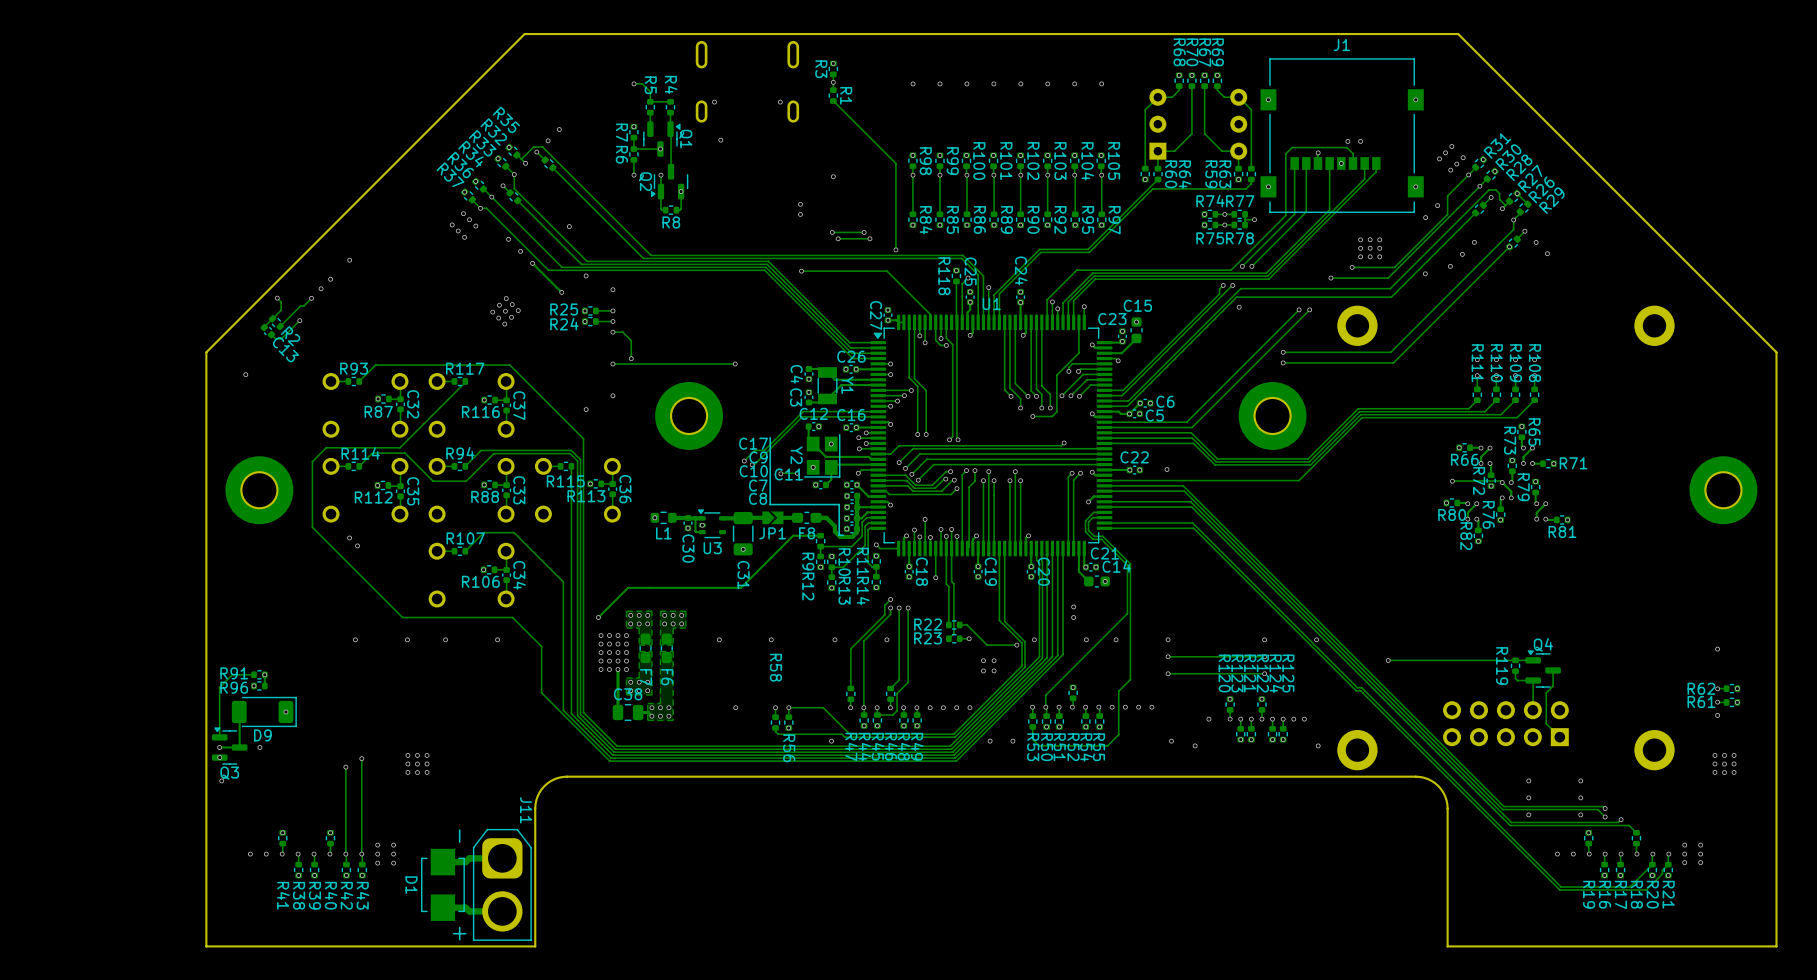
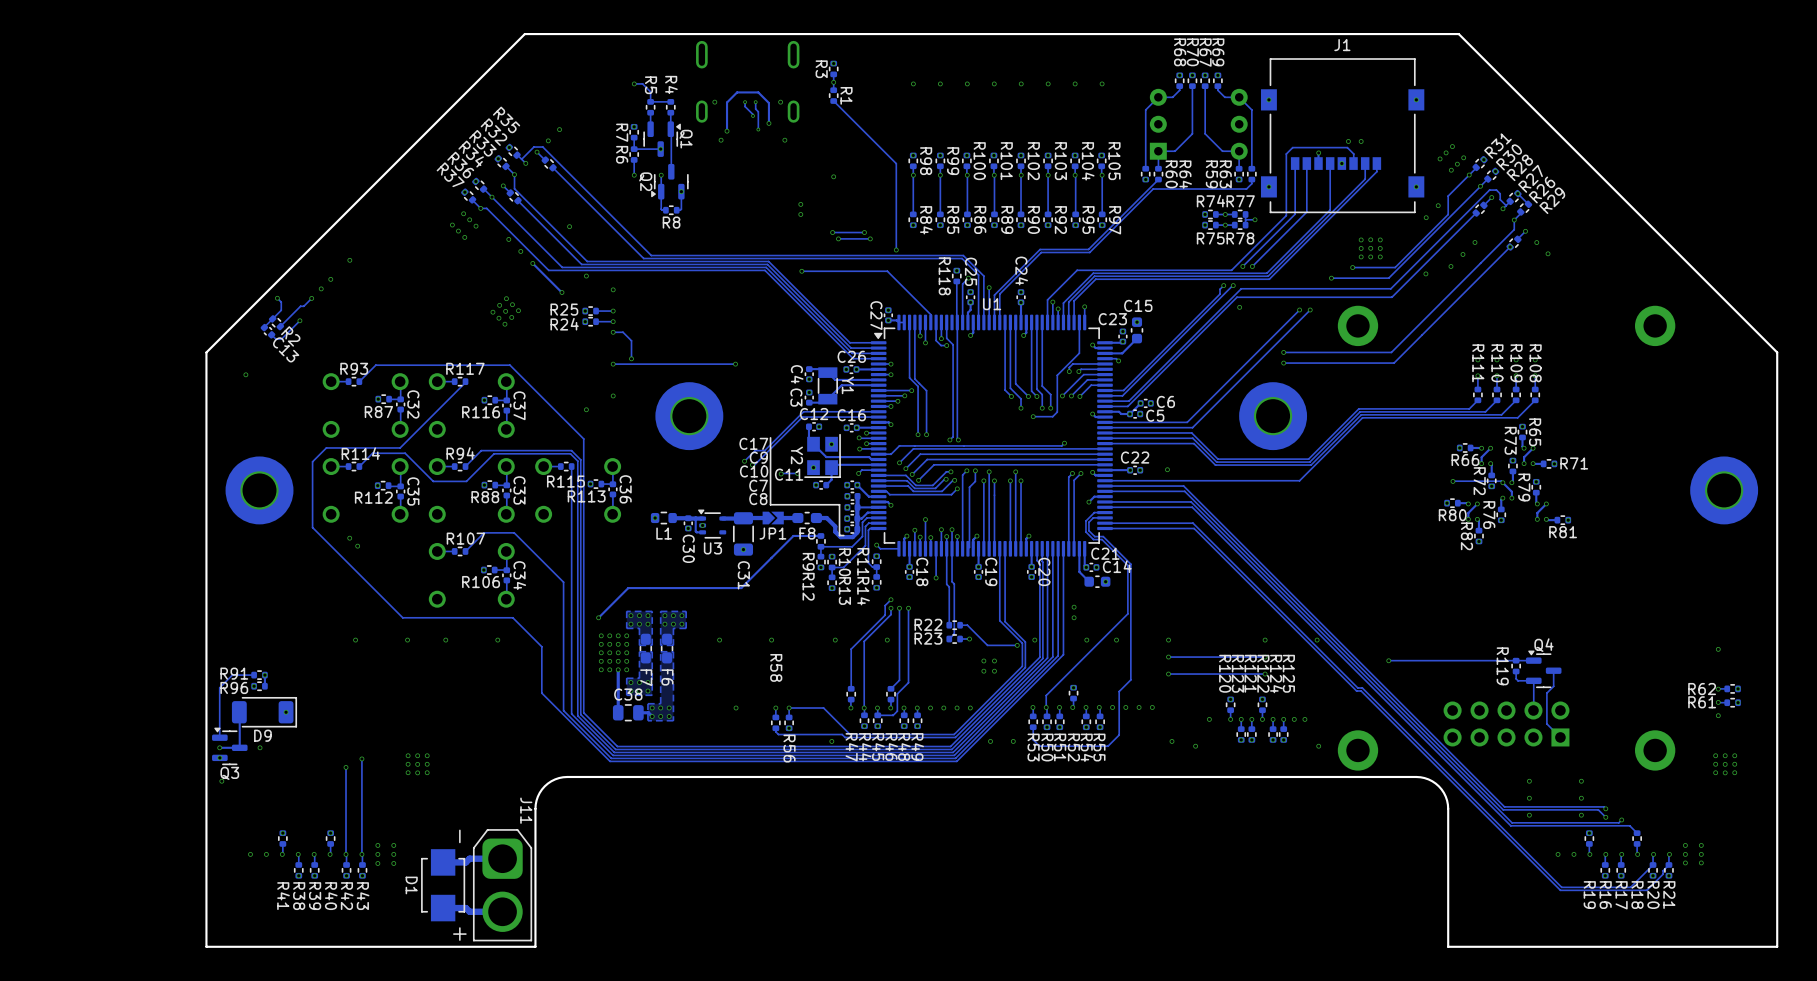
track: none -> (745, 102) (745, 106) (753, 115)
via: none -> (745, 102)
track: none -> (755, 102) (755, 109) (758, 111) (758, 129)
via: none -> (755, 102)
via: none -> (753, 115)
track: none -> (768, 123) (768, 103) (758, 92) (737, 92) (727, 102) (727, 131)
via: none -> (768, 123)
via: none -> (758, 129)
via: none -> (727, 131)
via: none -> (784, 140)

